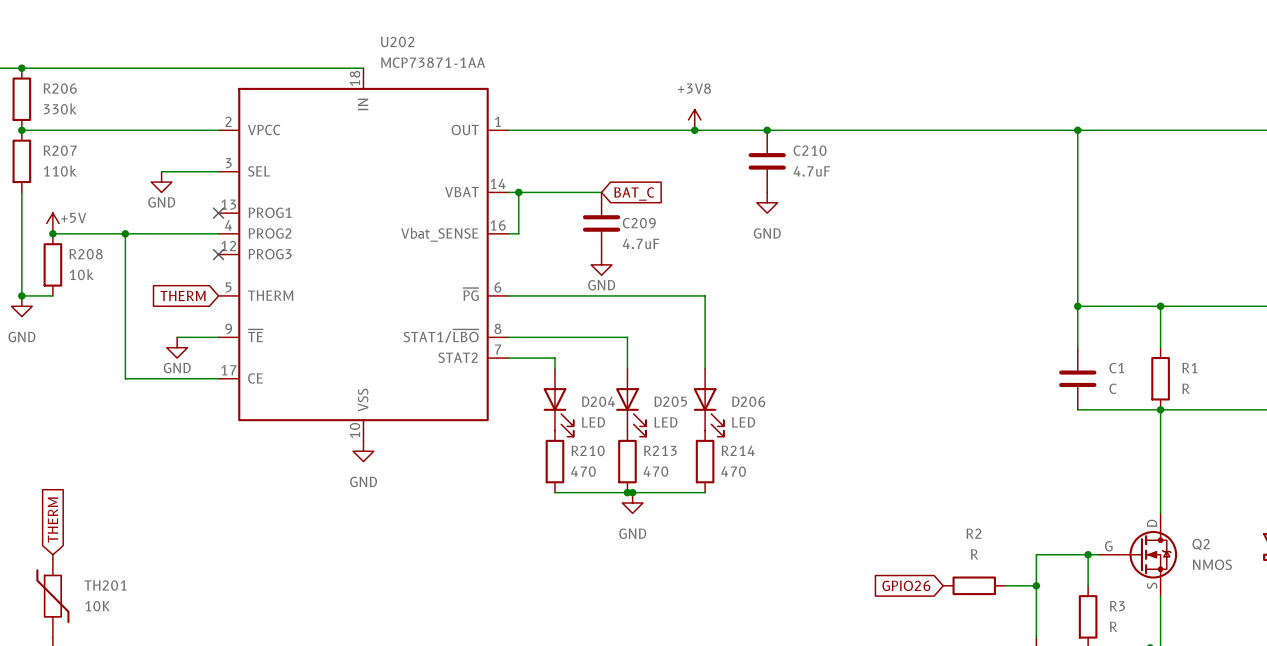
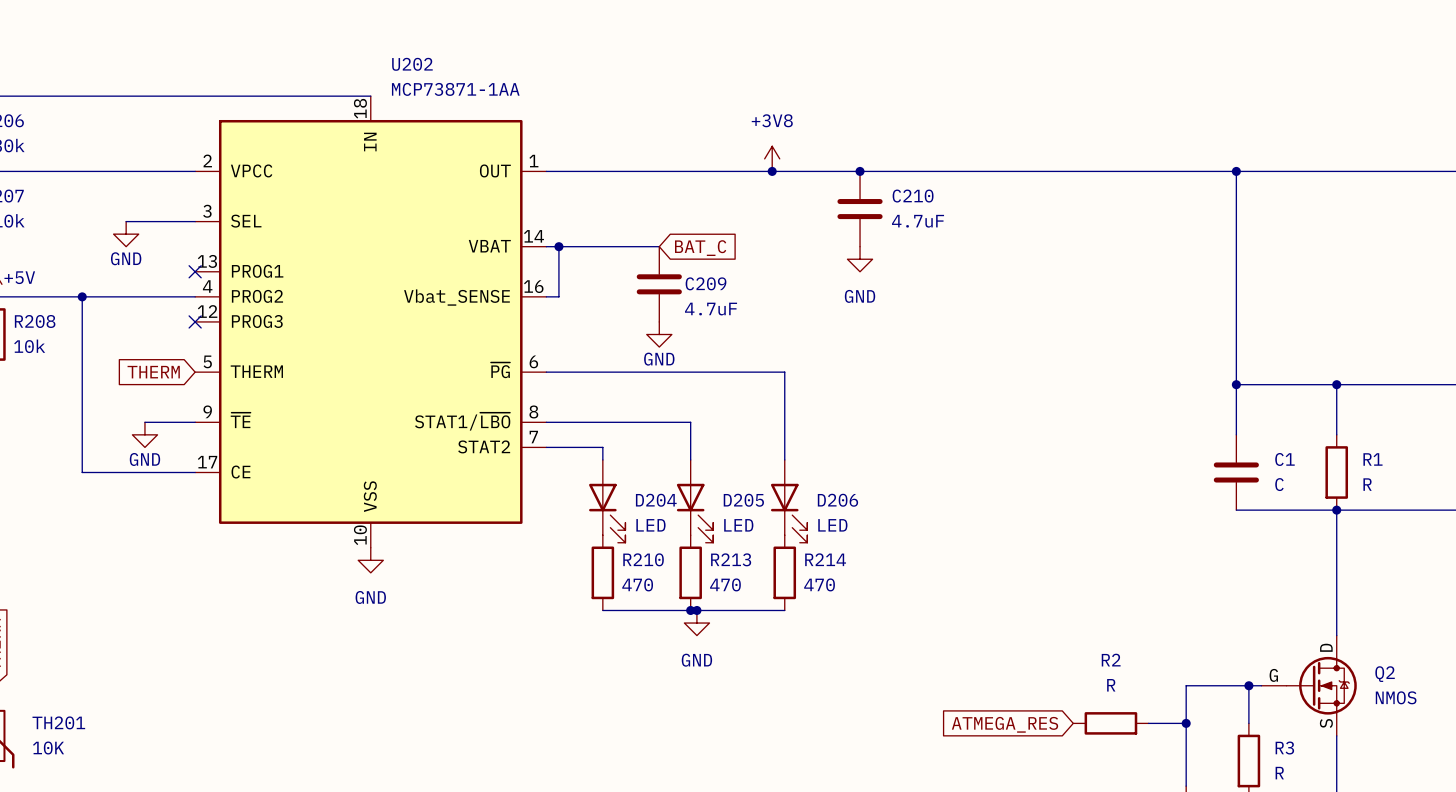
global label: GPIO26 (906, 585) -> ATMEGA_RES (1005, 724)

